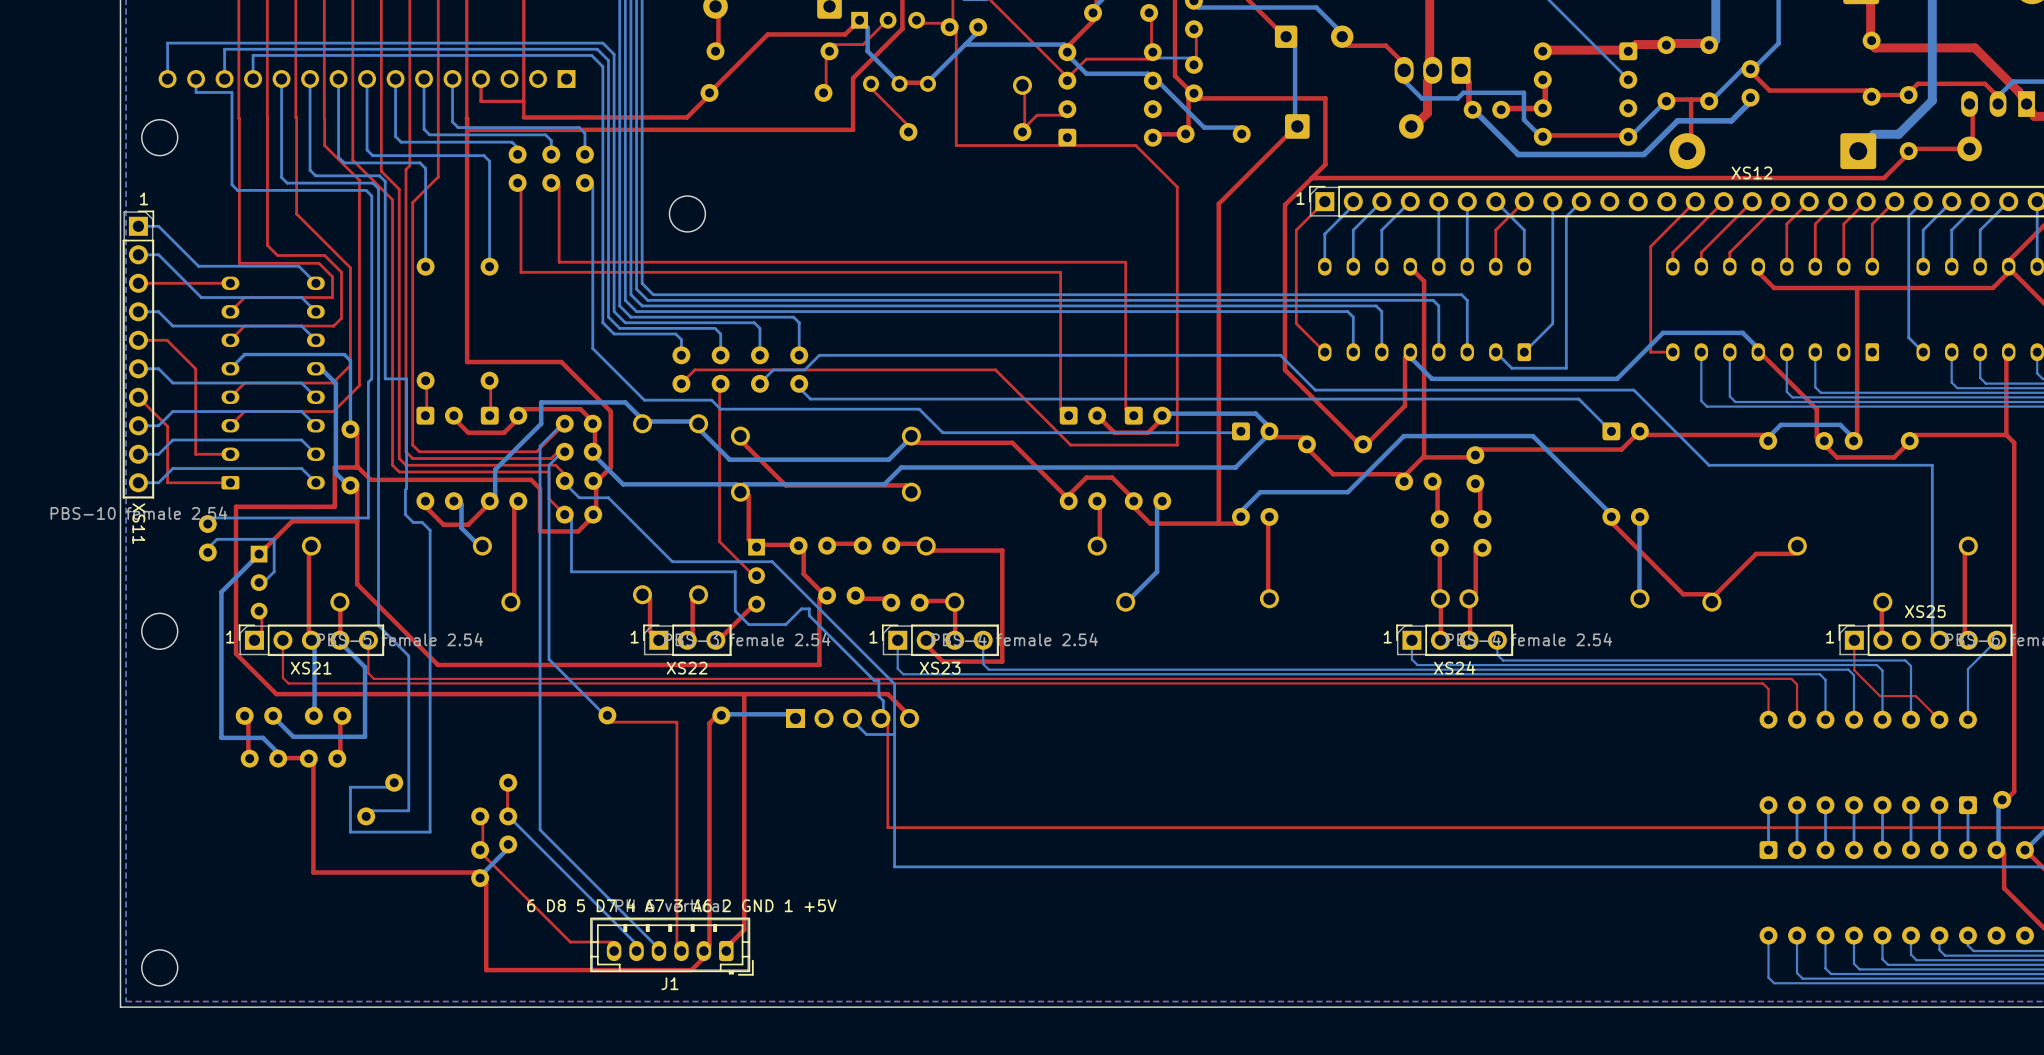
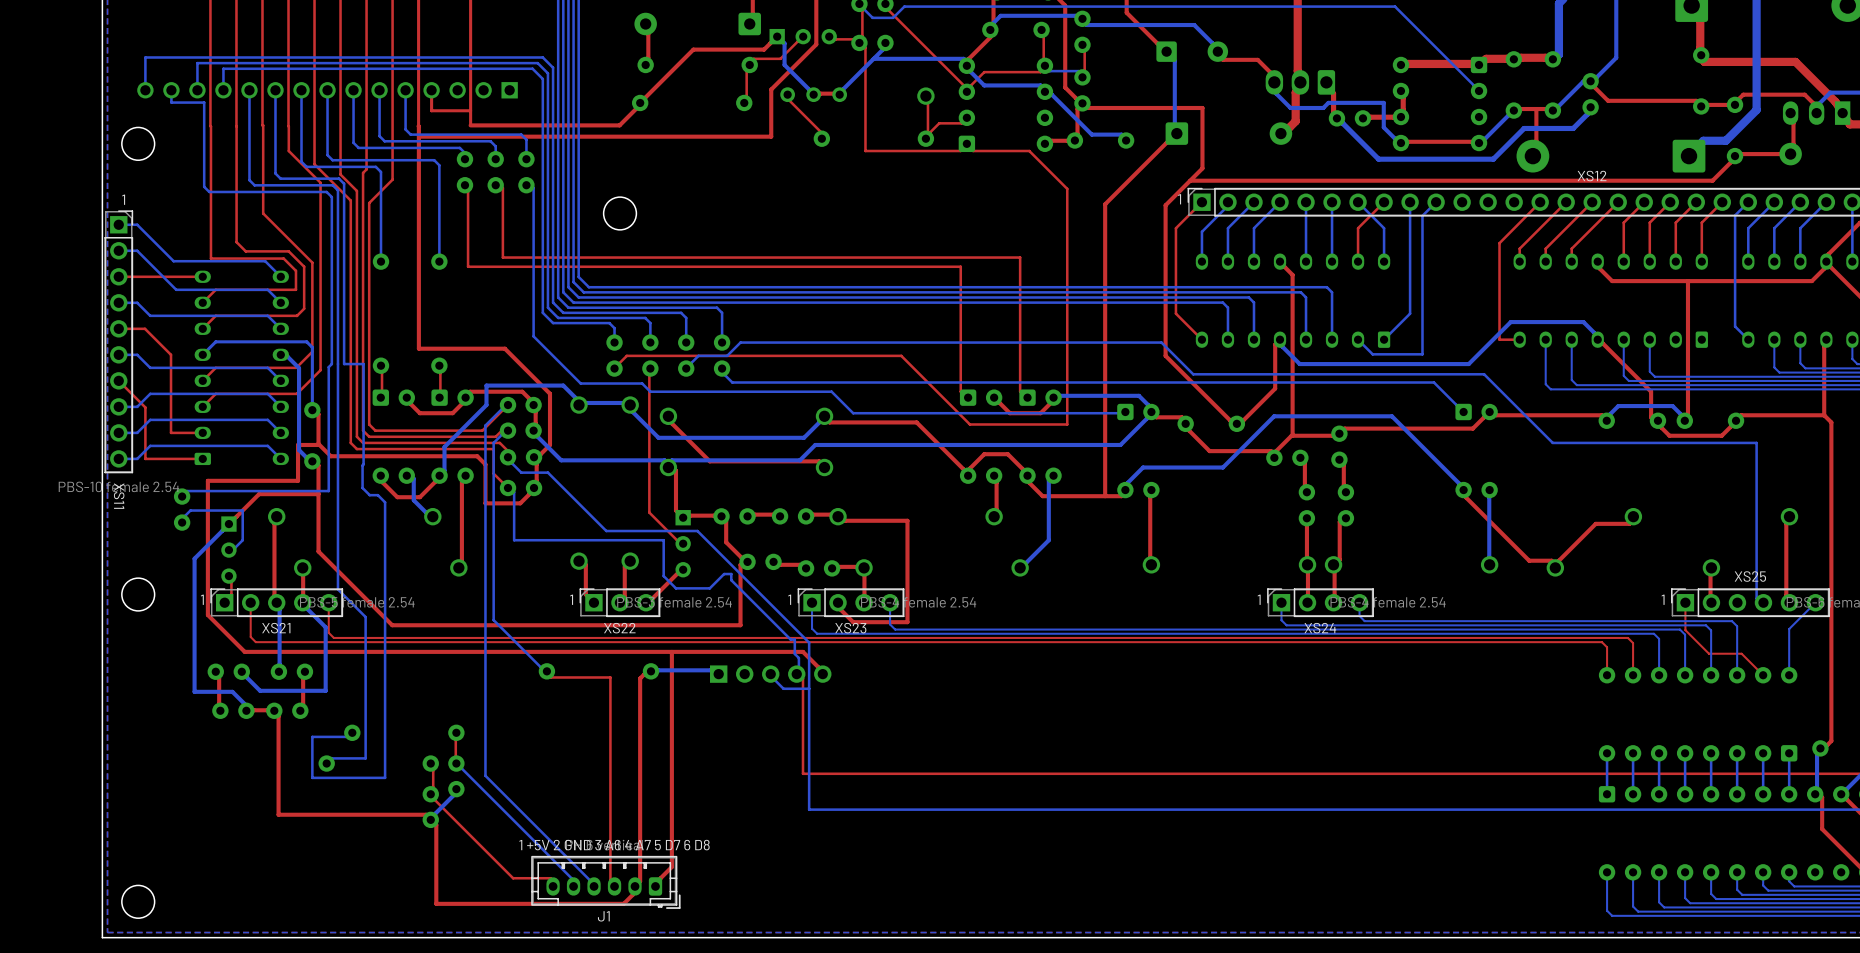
text: 6 D8 5 D7 4 A7 3 A6 2 GND 1 +5V (681, 905) -> 1 +5V 2 GND 3 A6 4 A7 5 D7 6 D8 (614, 845)

